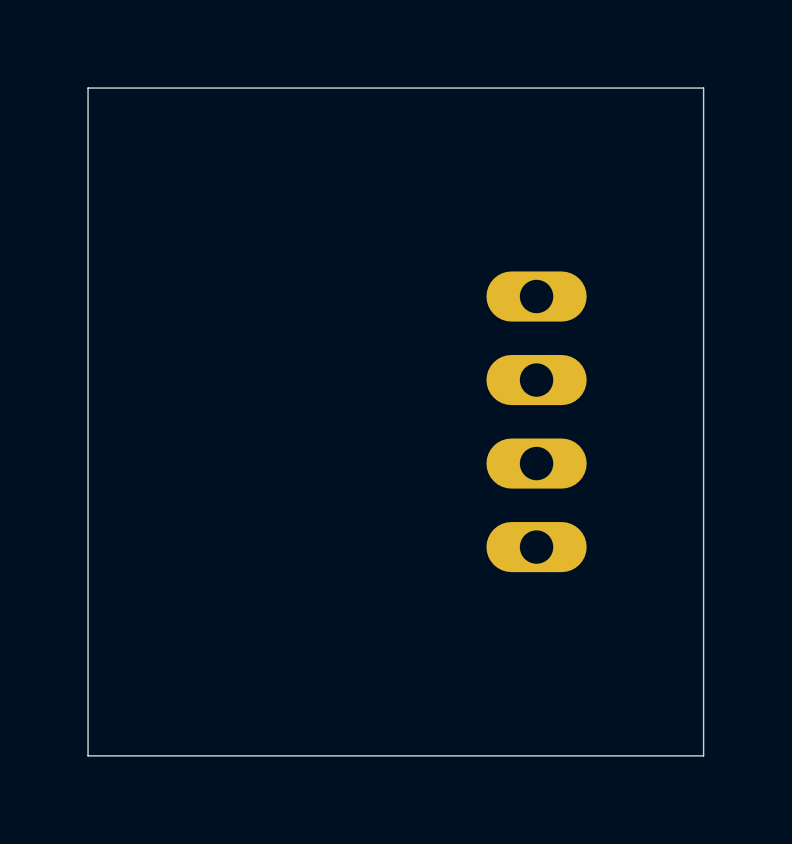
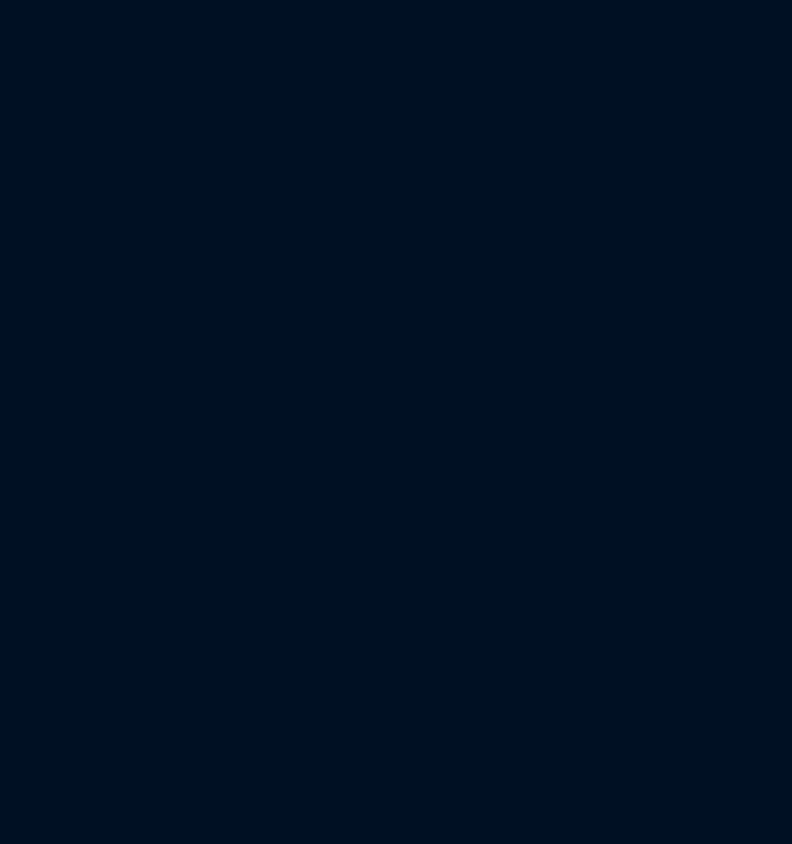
board edge: (703, 88) (88, 88) (88, 755) (703, 755) (703, 88) -> none
part: (536, 421) -> none

